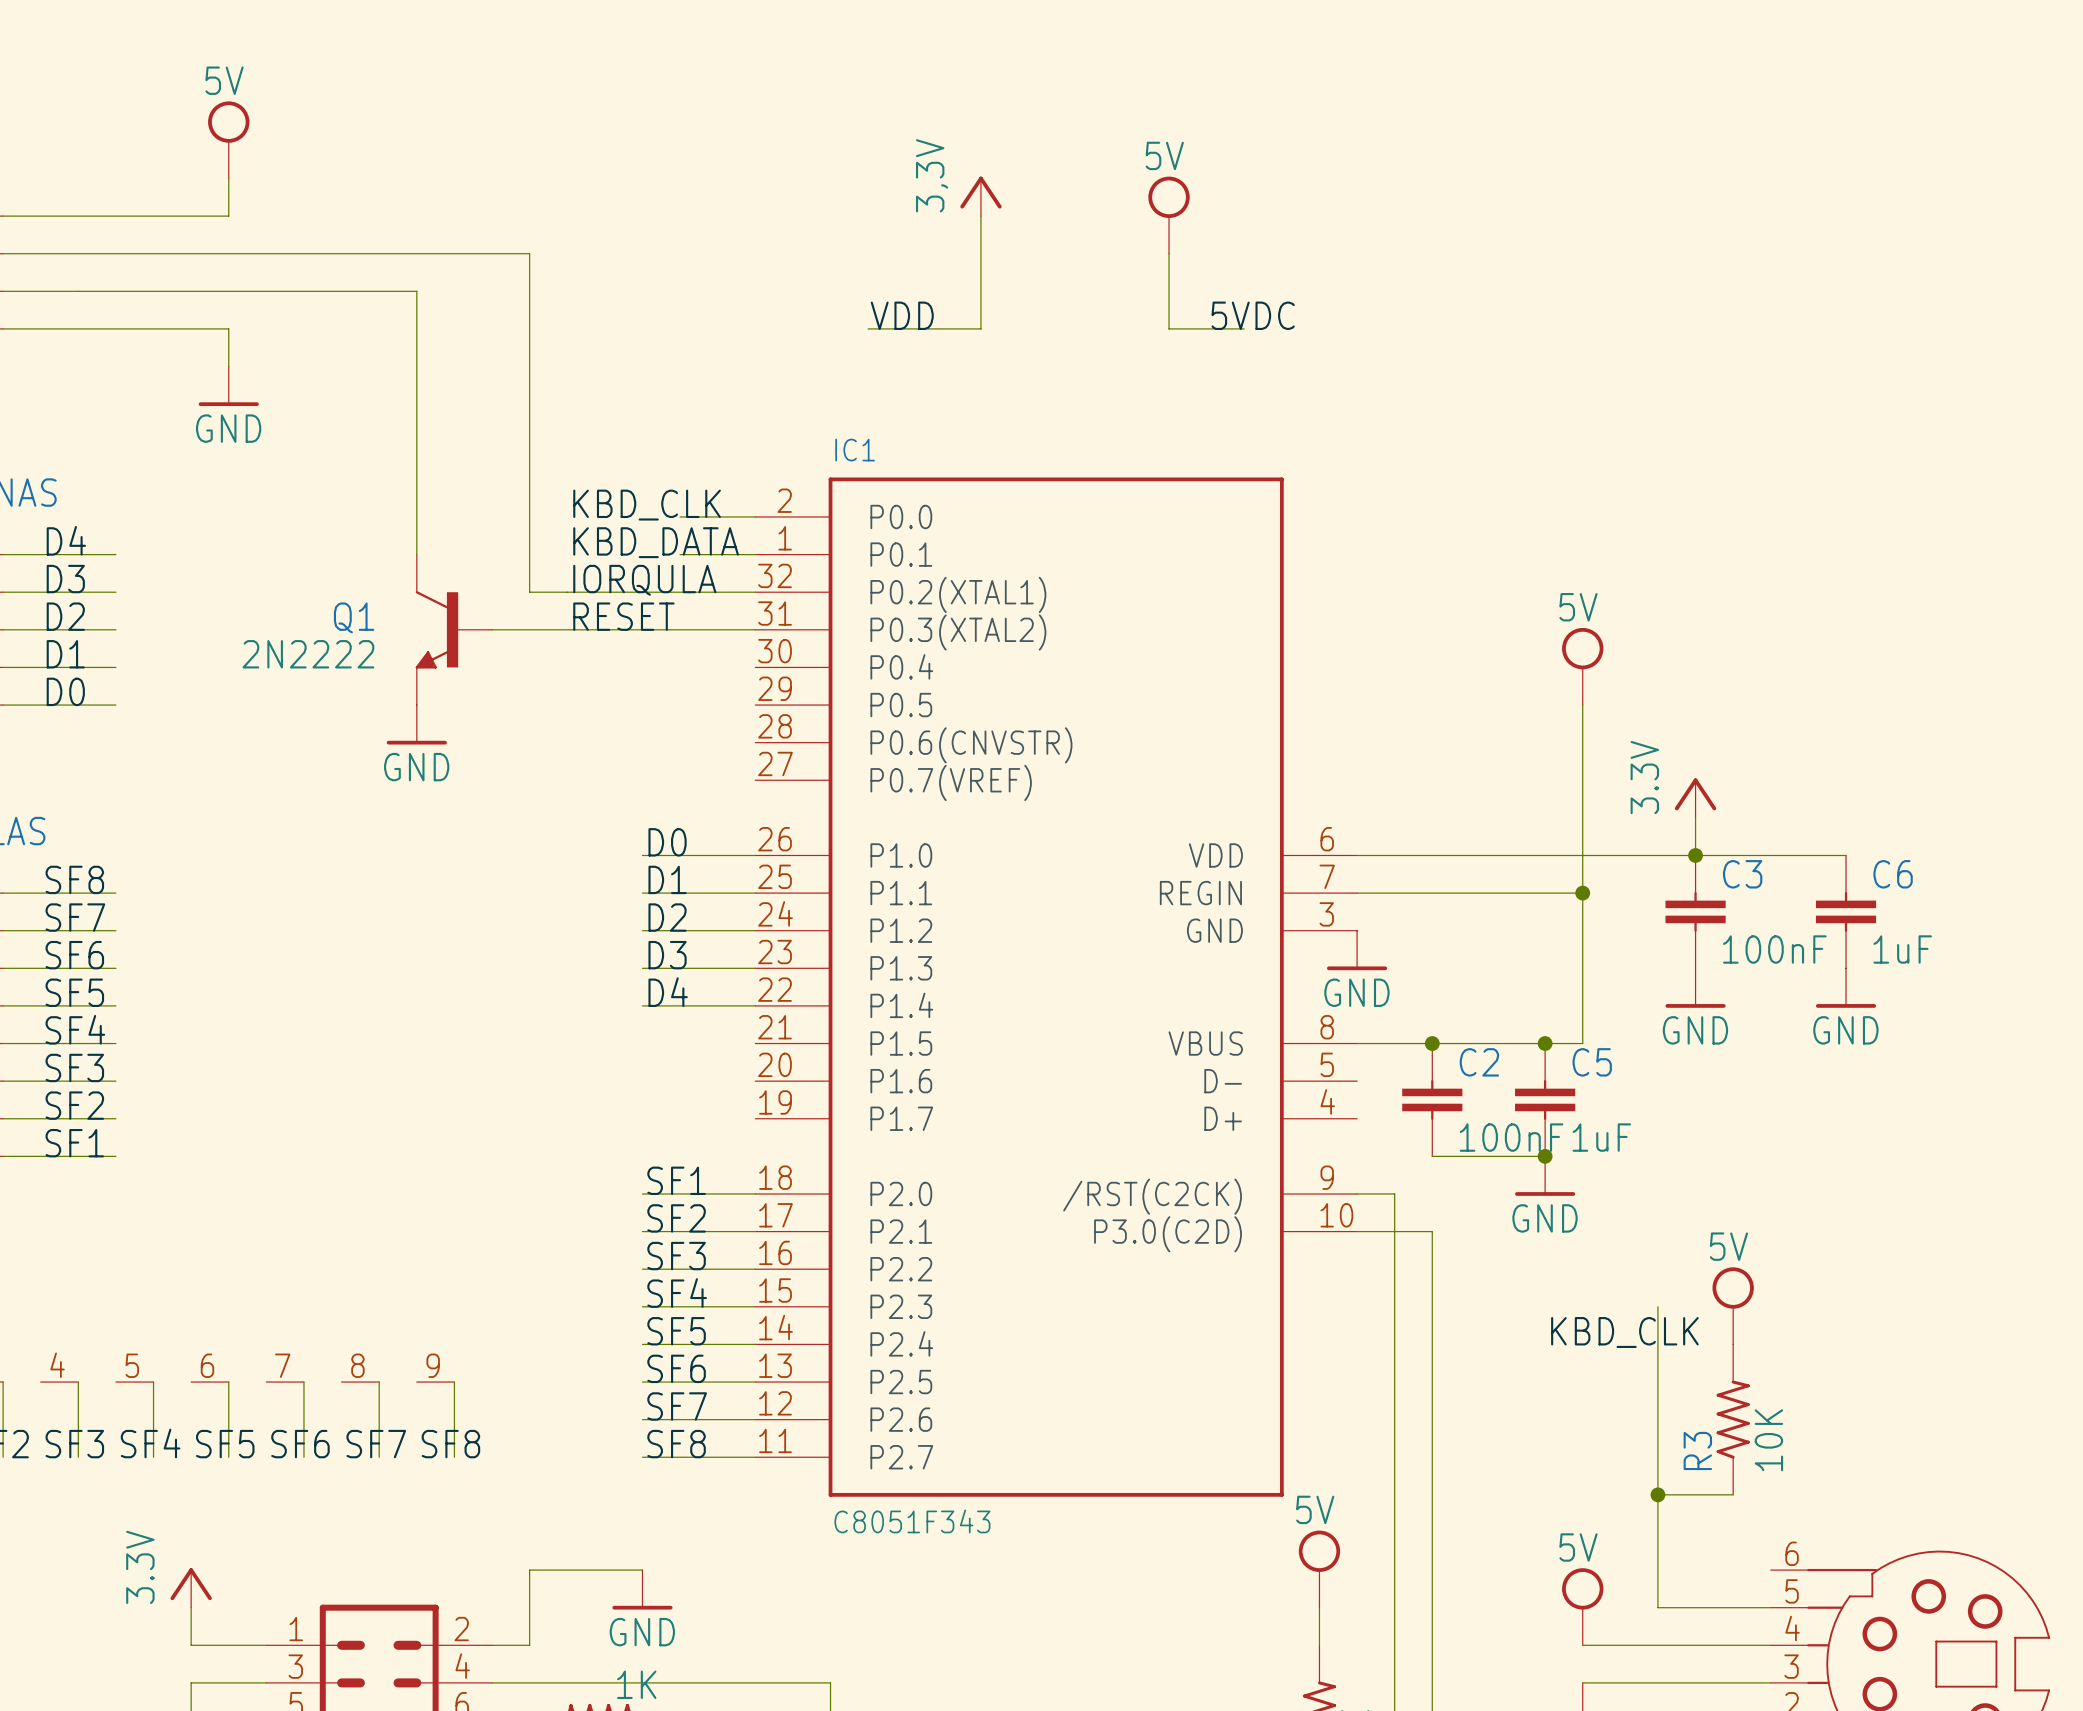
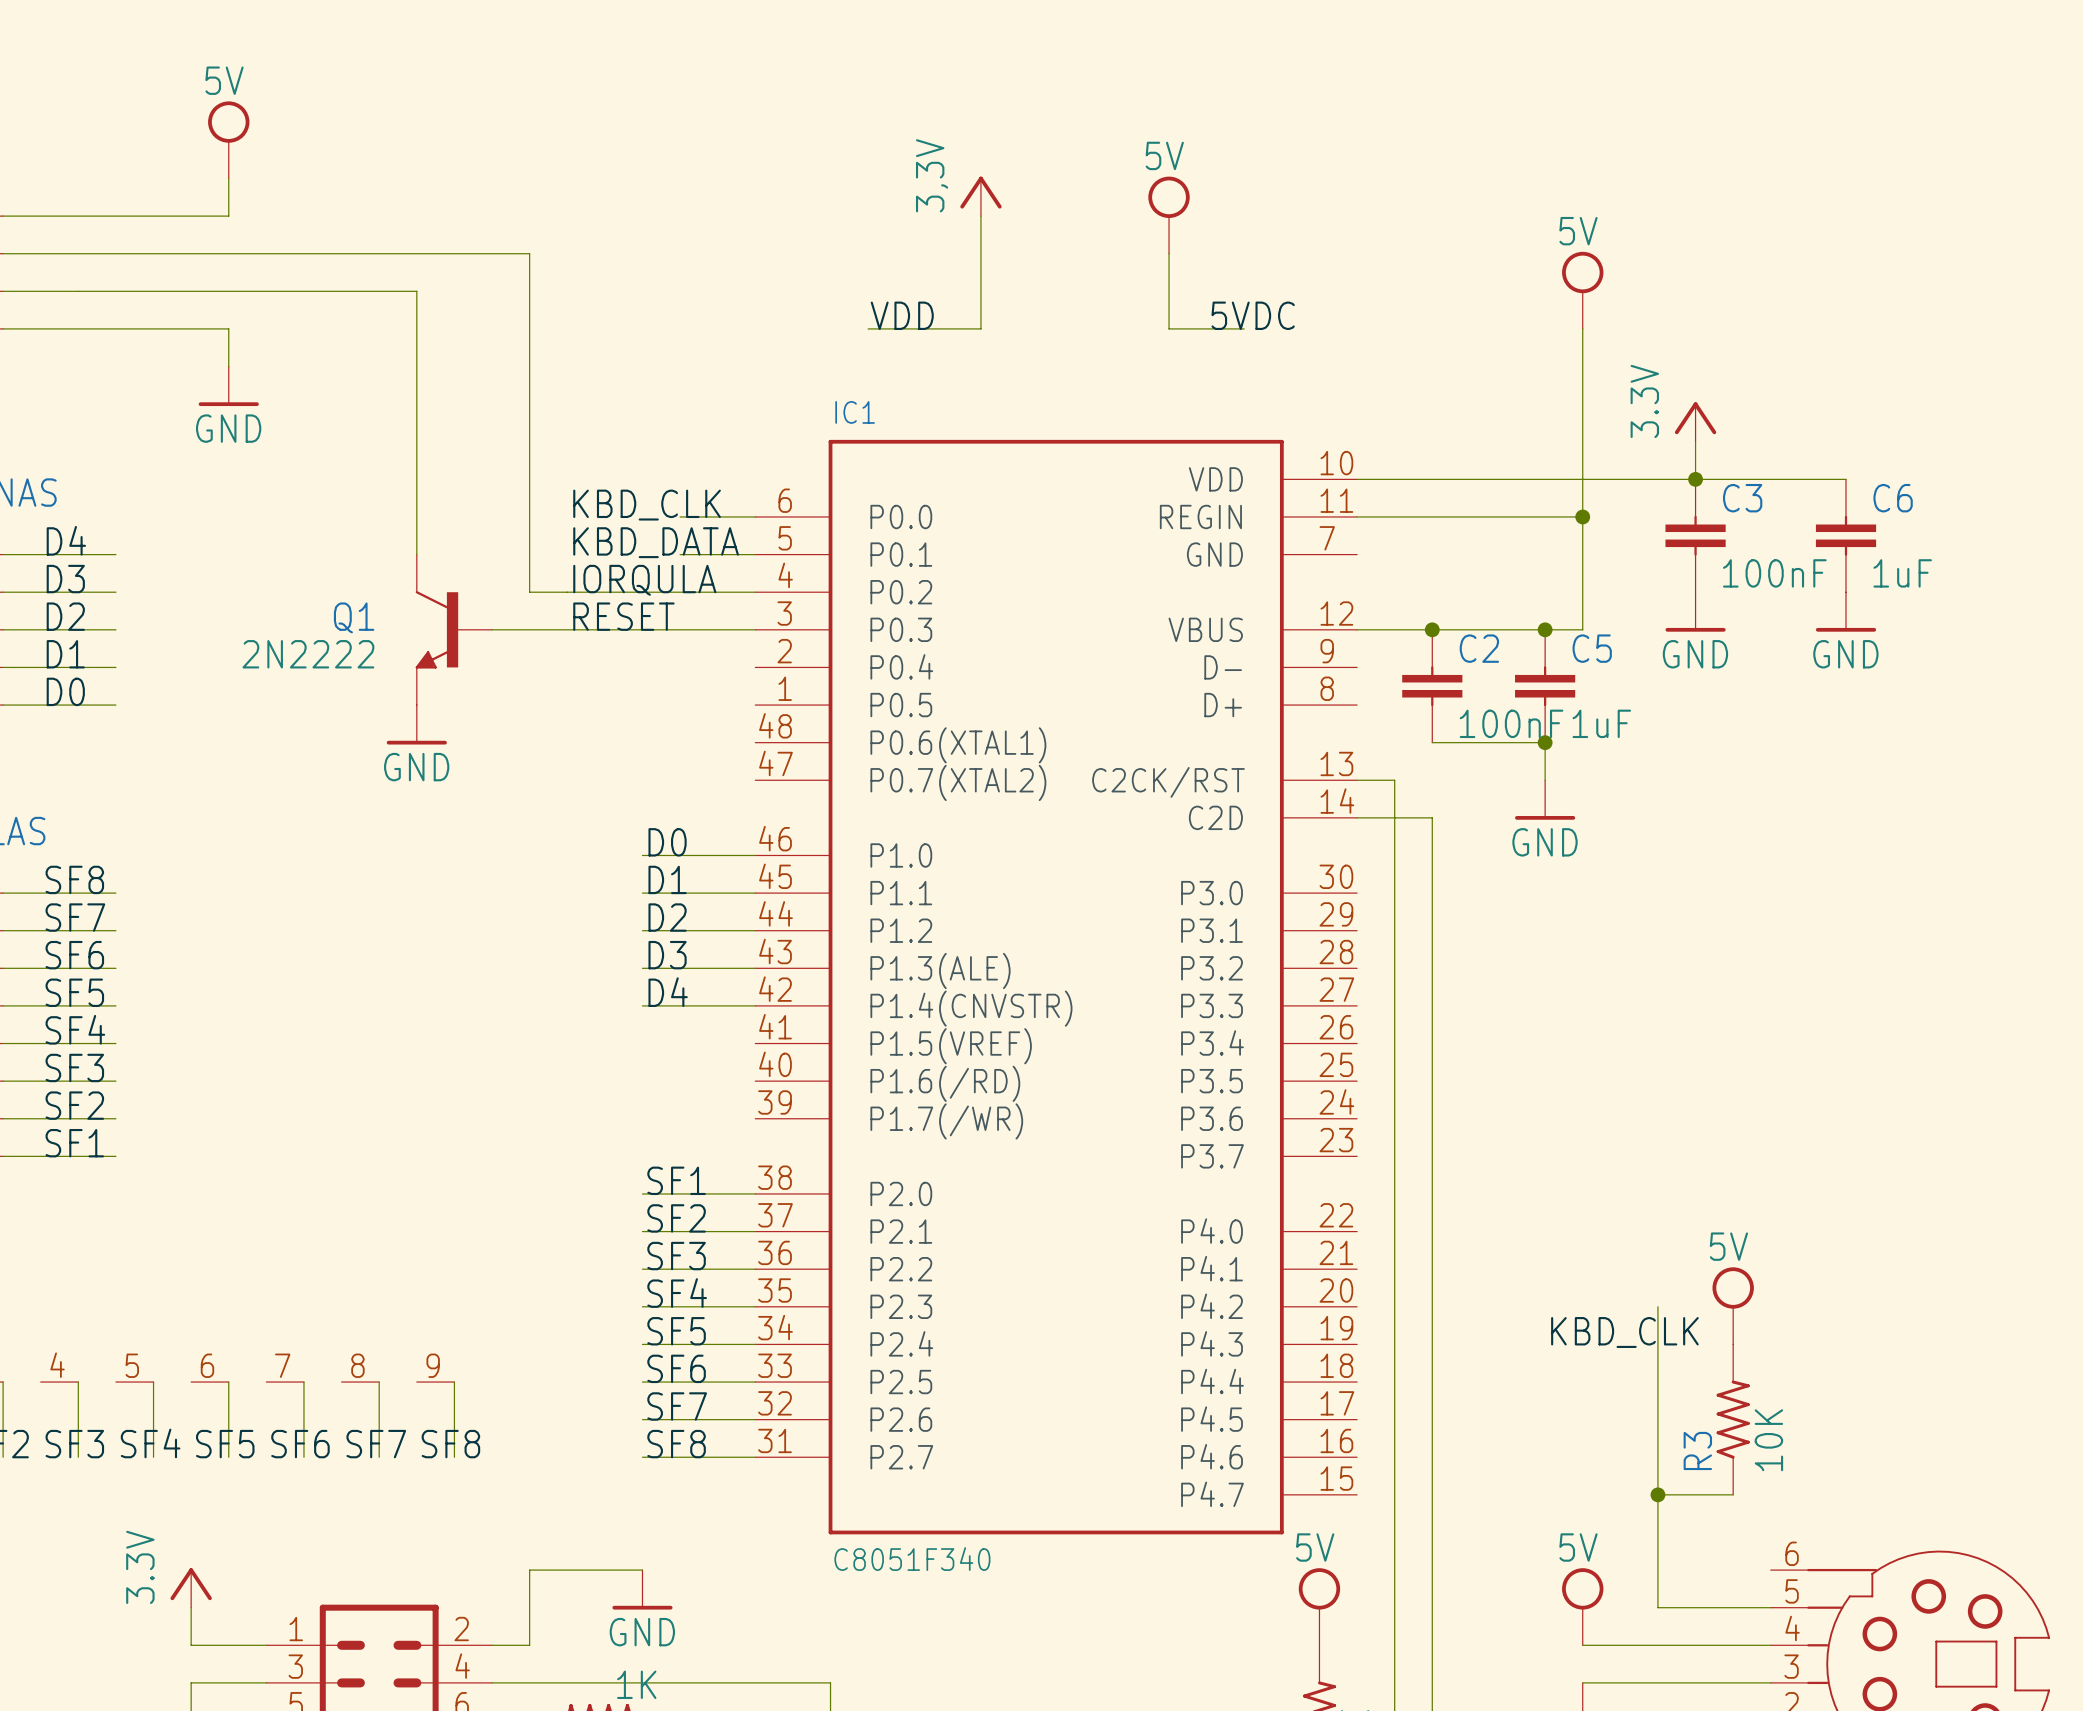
power symbol: none -> 5V (1582, 290)
wire: none -> (1582, 328) (1582, 629) (1357, 629)
power symbol: none -> 3.3V (1695, 422)
wire: none -> (1695, 441) (1695, 479)
IC1 name position: IC1 (855, 450) -> IC1 (855, 412)
IC1 symbol: [755, 477, 1358, 1497] -> [755, 439, 1358, 1535]
wire: none -> (1357, 479) (1846, 479)
junction: none -> (1695, 479)
wire: none -> (1357, 516) (1582, 516)
junction: none -> (1582, 516)
power symbol: none -> GND (1695, 611)
power symbol: none -> GND (1846, 611)
junction: none -> (1432, 629)
junction: none -> (1545, 629)
power symbol: 5V (1582, 666) -> none
wire: (1582, 705) (1582, 1043) (1357, 1043) -> none
wire: none -> (1432, 742) (1545, 742) (1545, 780)
junction: none -> (1545, 742)
power symbol: 3.3V (1695, 798) -> none
power symbol: none -> GND (1545, 800)
wire: (1695, 817) (1695, 855) -> none
wire: (1357, 855) (1846, 855) -> none
junction: (1695, 855) -> none
wire: (1357, 893) (1582, 893) -> none
junction: (1582, 893) -> none
C3 position: (1695, 911) -> (1695, 535)
C6 position: (1846, 911) -> (1846, 535)
power symbol: GND (1357, 950) -> none
power symbol: GND (1695, 988) -> none
power symbol: GND (1846, 988) -> none
junction: (1432, 1043) -> none
junction: (1545, 1043) -> none
C2 position: (1432, 1099) -> (1432, 686)
C5 position: (1545, 1099) -> (1545, 686)
wire: (1432, 1156) (1545, 1156) -> none
junction: (1545, 1156) -> none
power symbol: GND (1545, 1176) -> none
wire: (1357, 1193) (1394, 1193) -> (1357, 780) (1394, 780) (1394, 1193)
wire: (1357, 1231) (1432, 1231) -> (1357, 817) (1432, 817) (1432, 1231)
IC1 value: C8051F343 (912, 1521) -> C8051F340 (912, 1559)
power symbol position: 5V (1319, 1569) -> 5V (1319, 1606)

